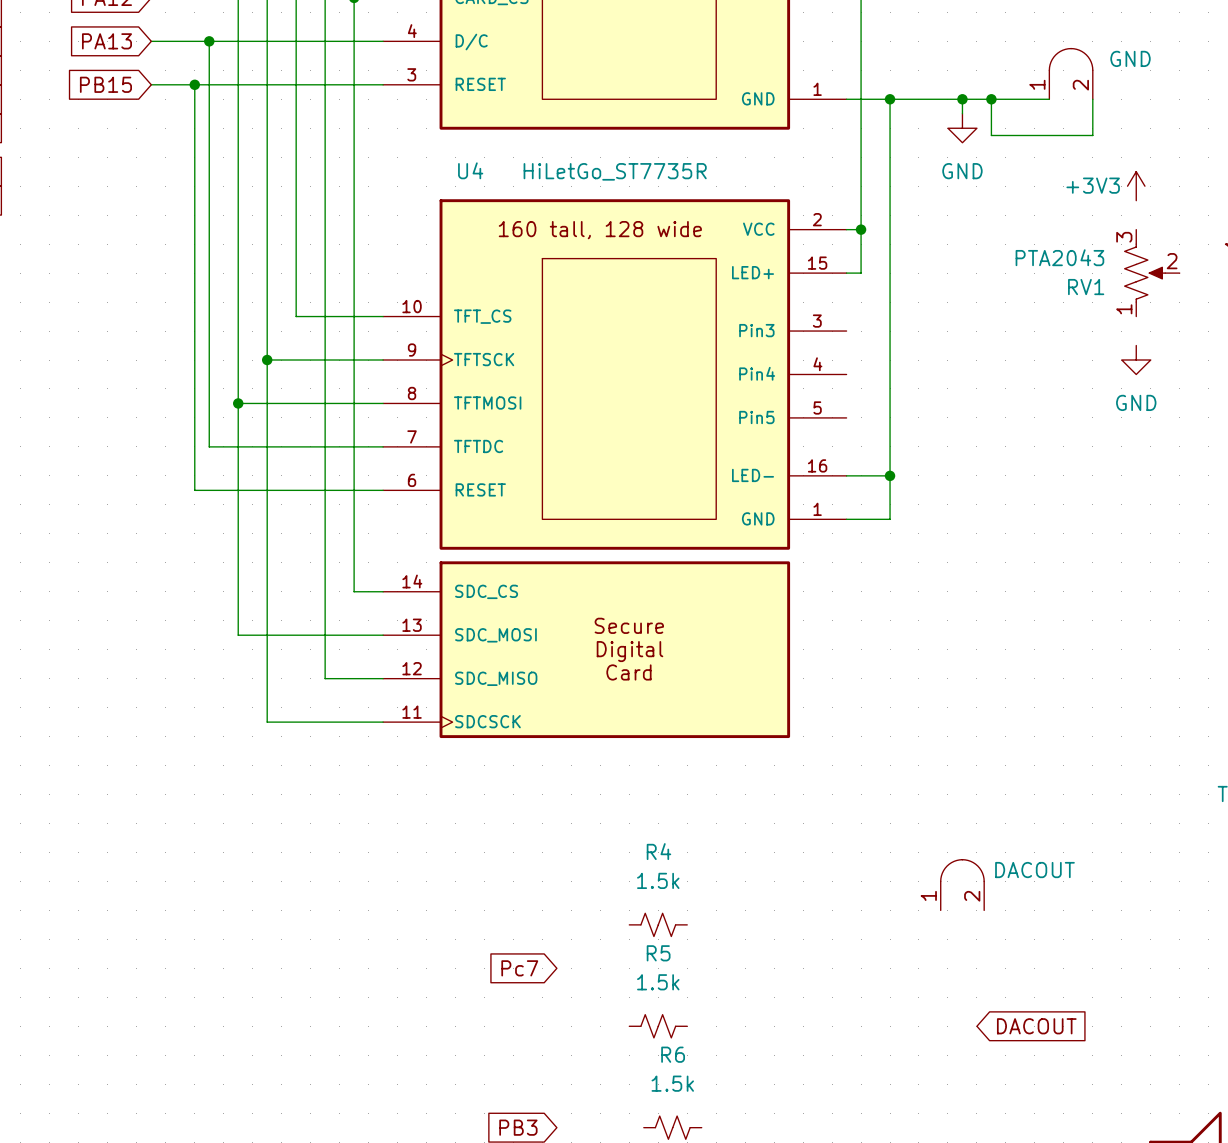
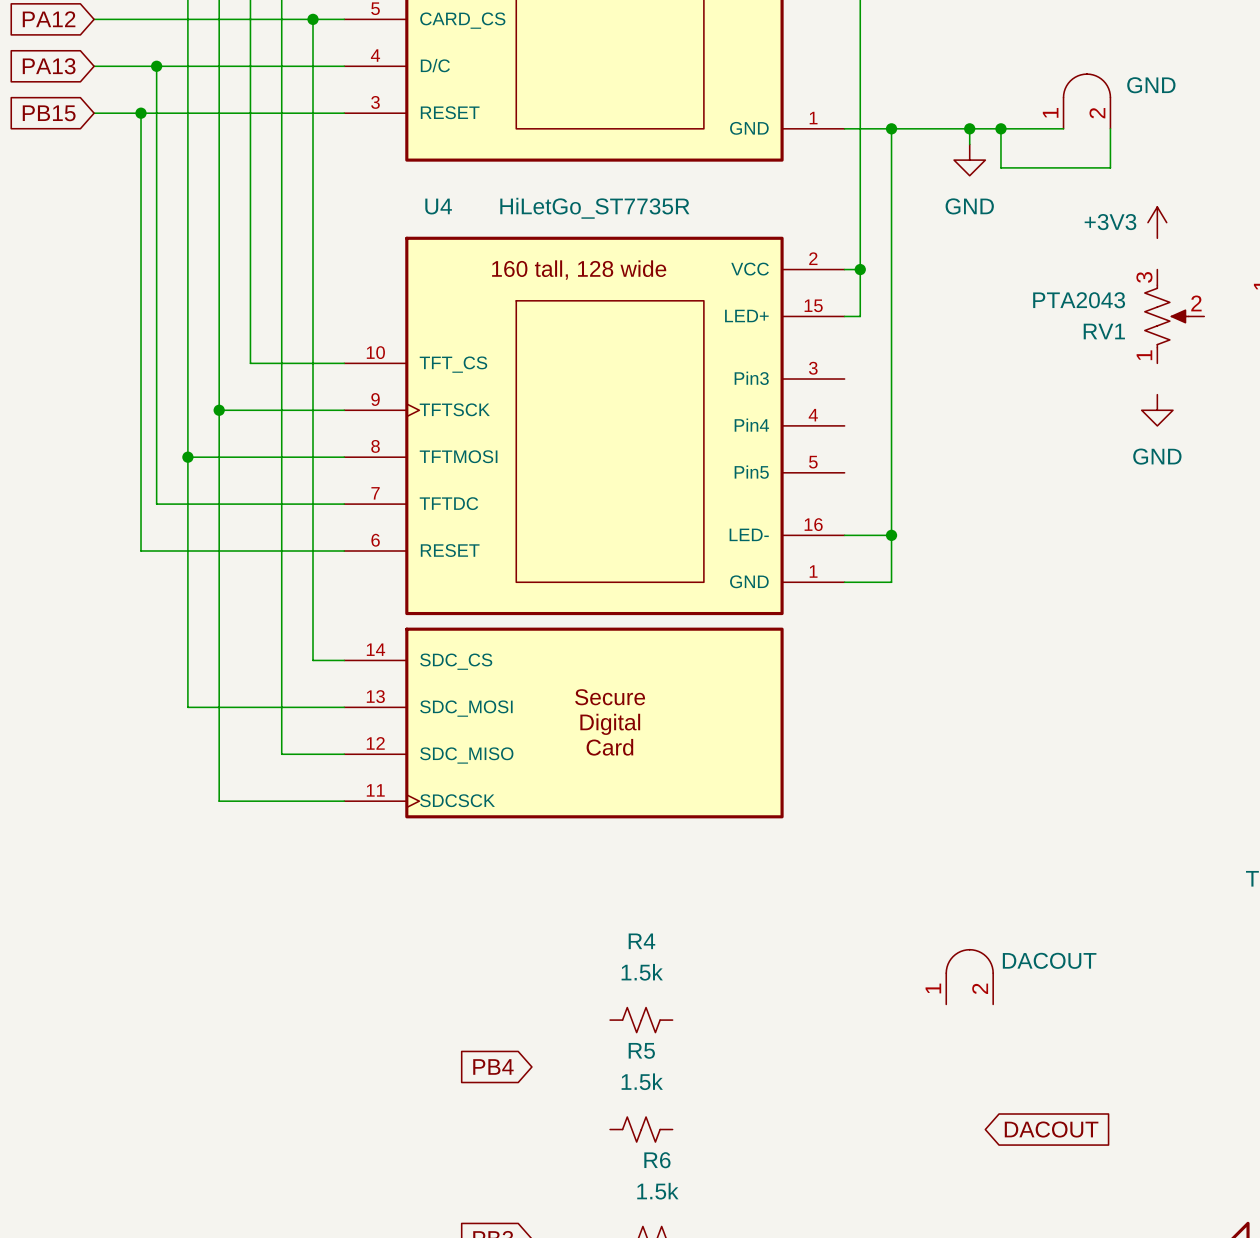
global label: Pc7 (519, 968) -> PB4 (493, 1066)

